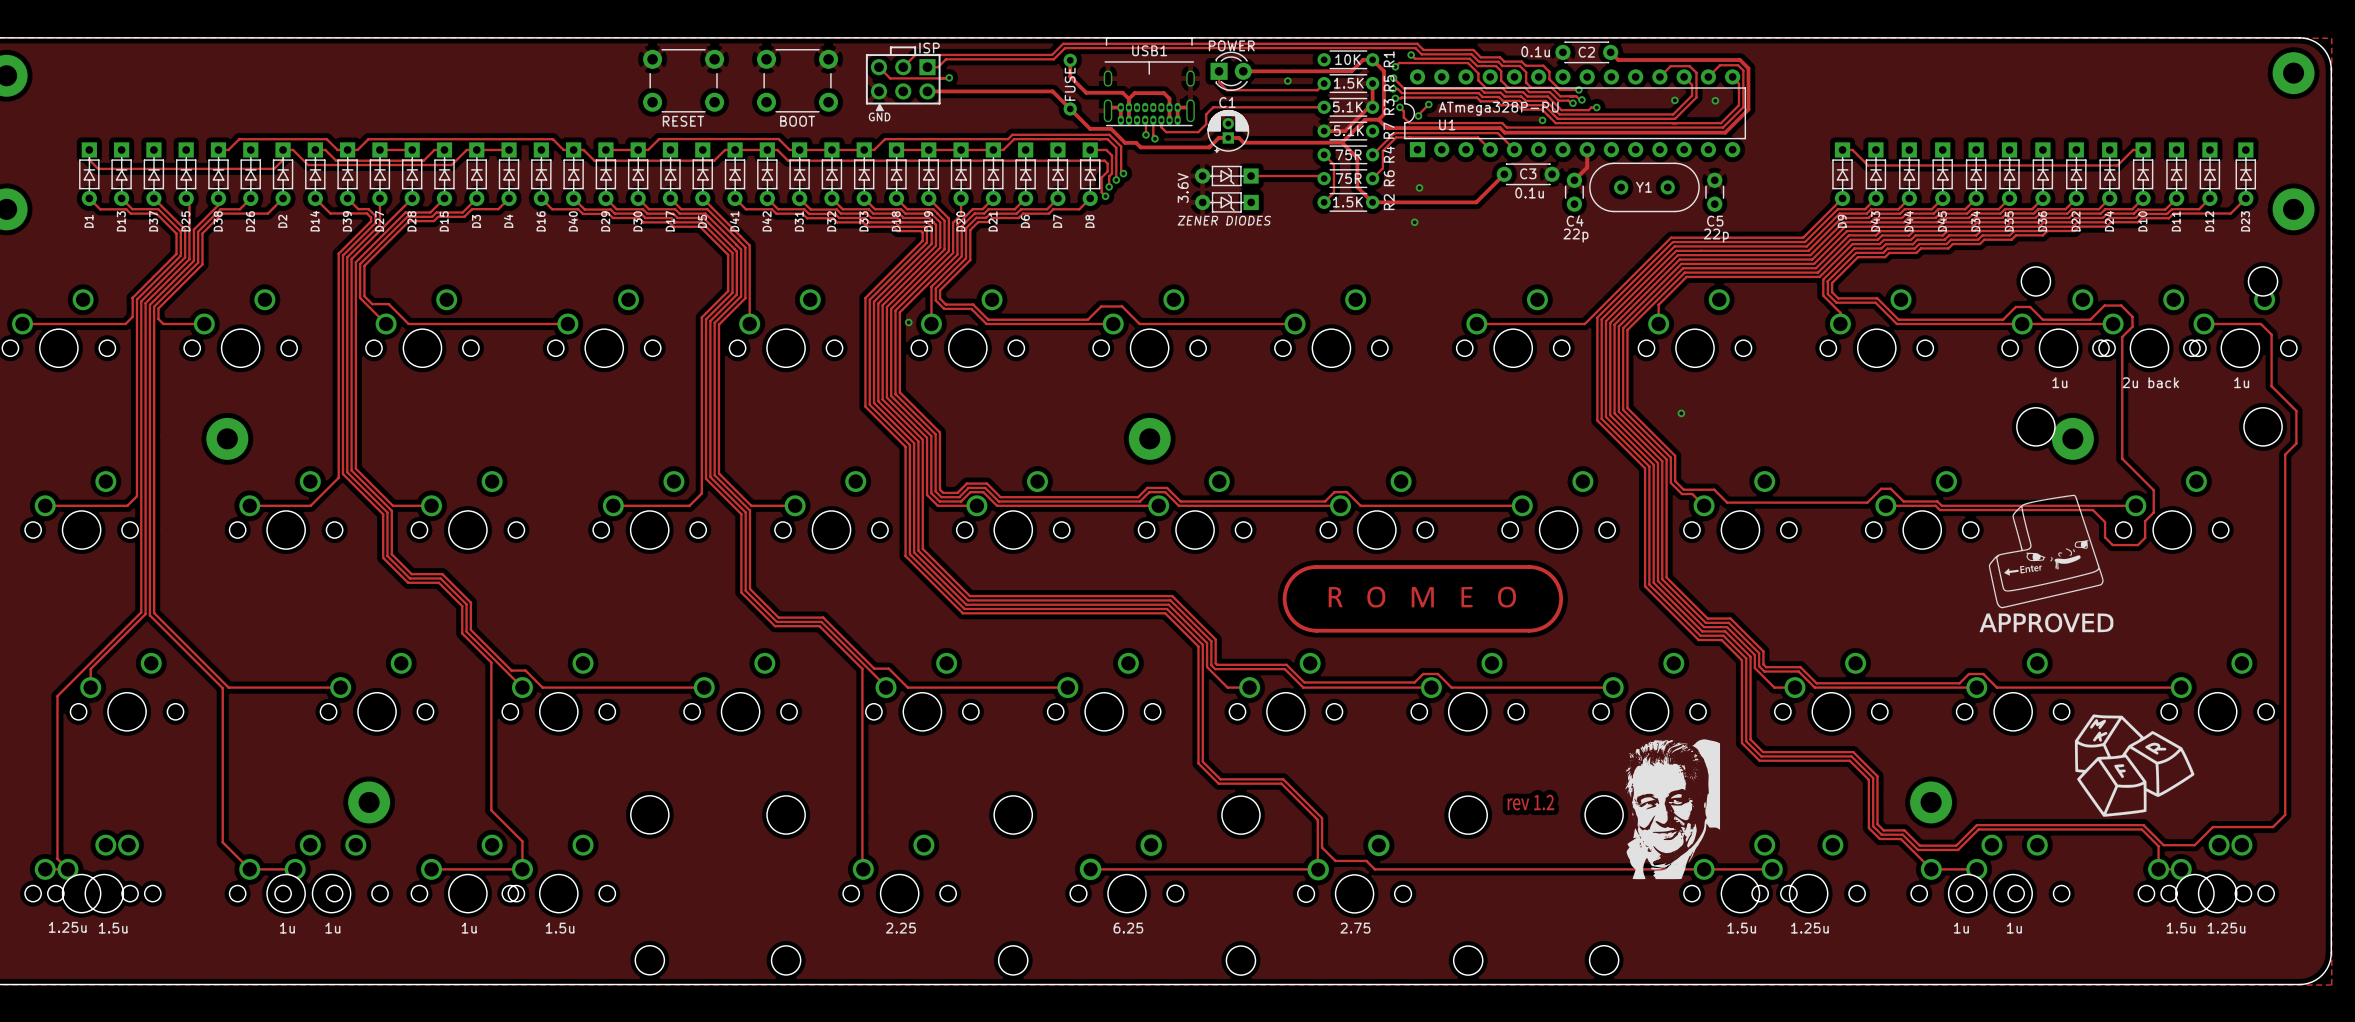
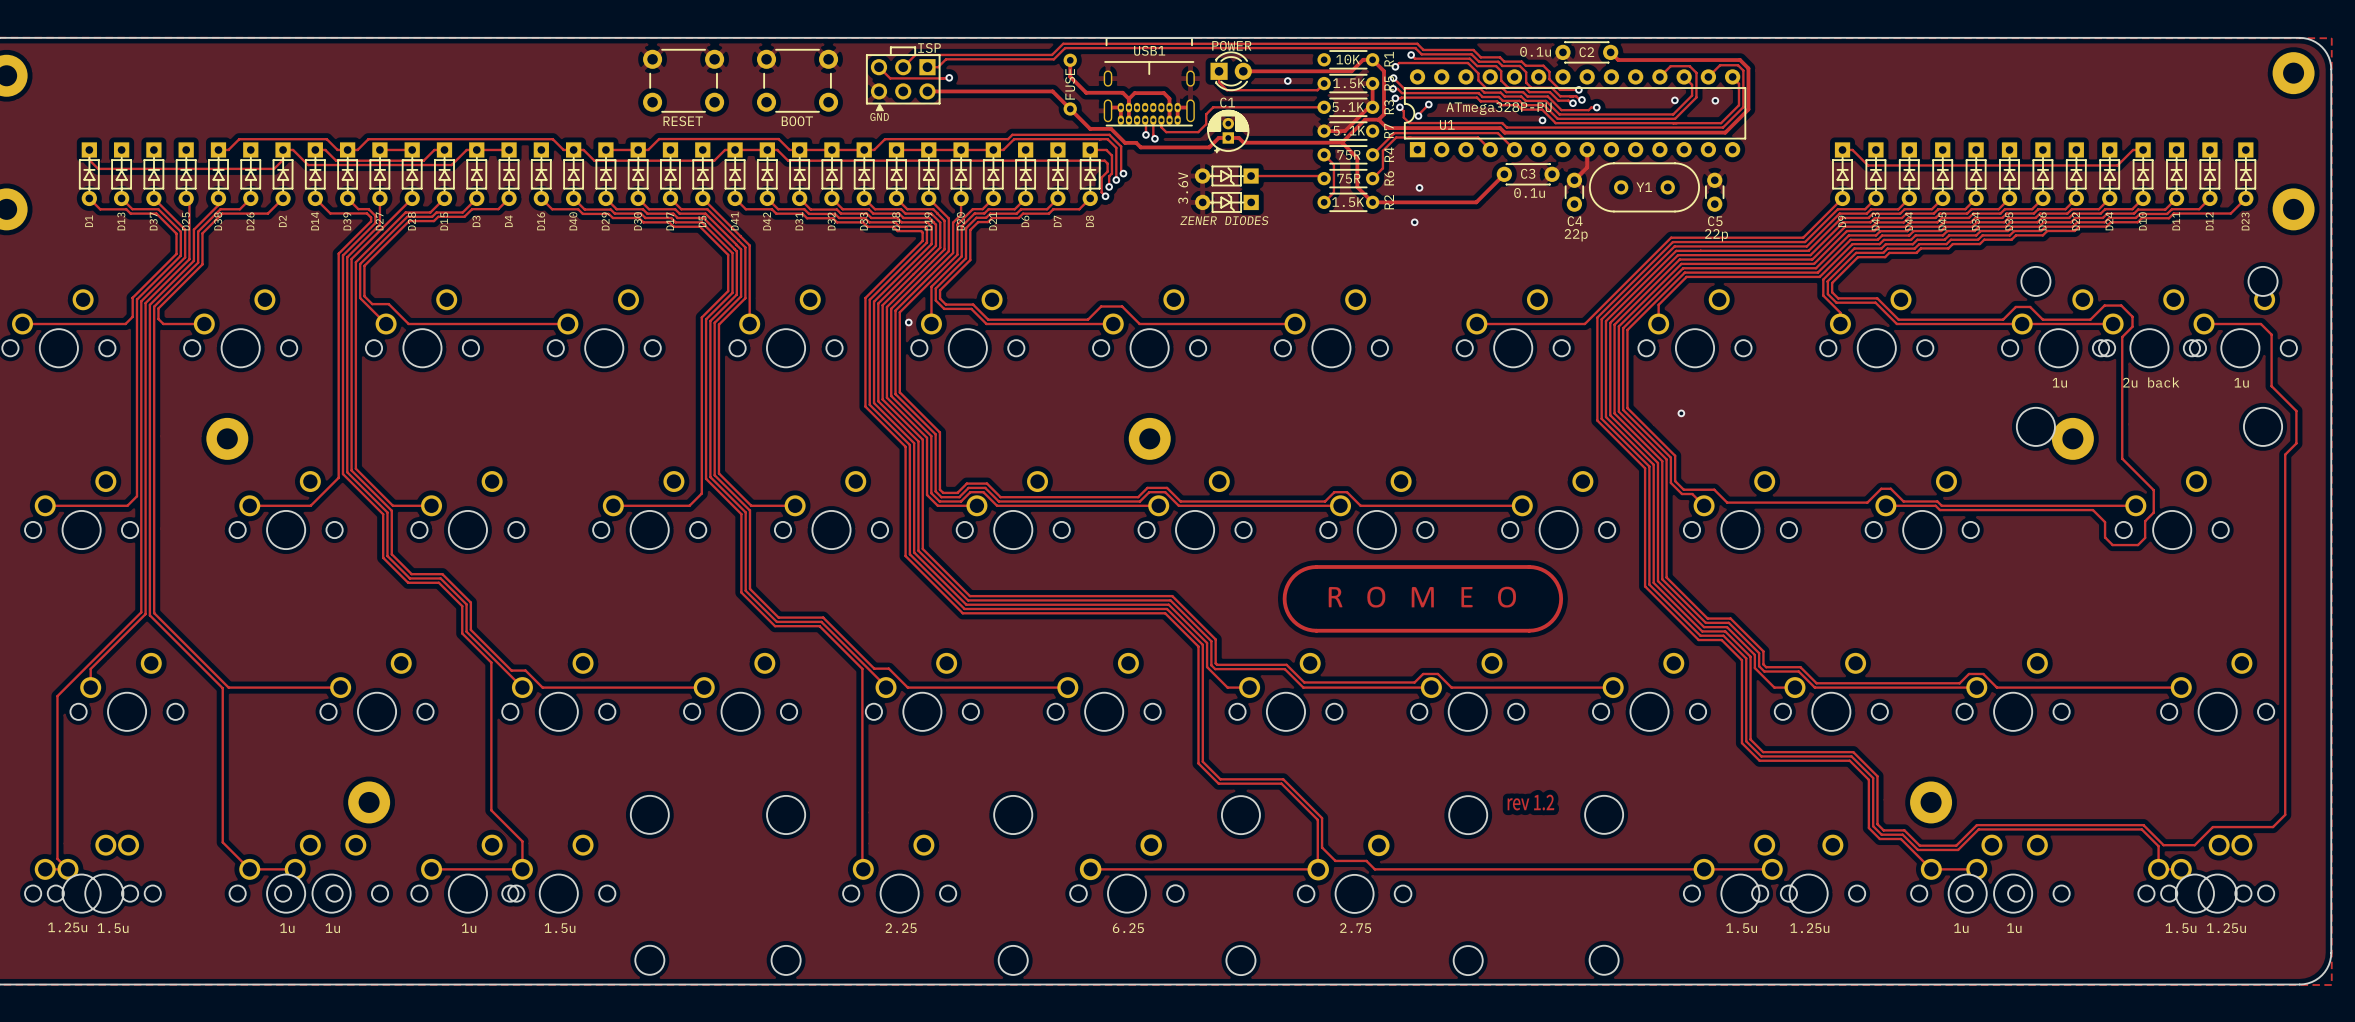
drawing: [1979, 494, 2114, 633] -> none
drawing: [2074, 714, 2195, 817] -> none
drawing: [1625, 739, 1721, 880] -> none

